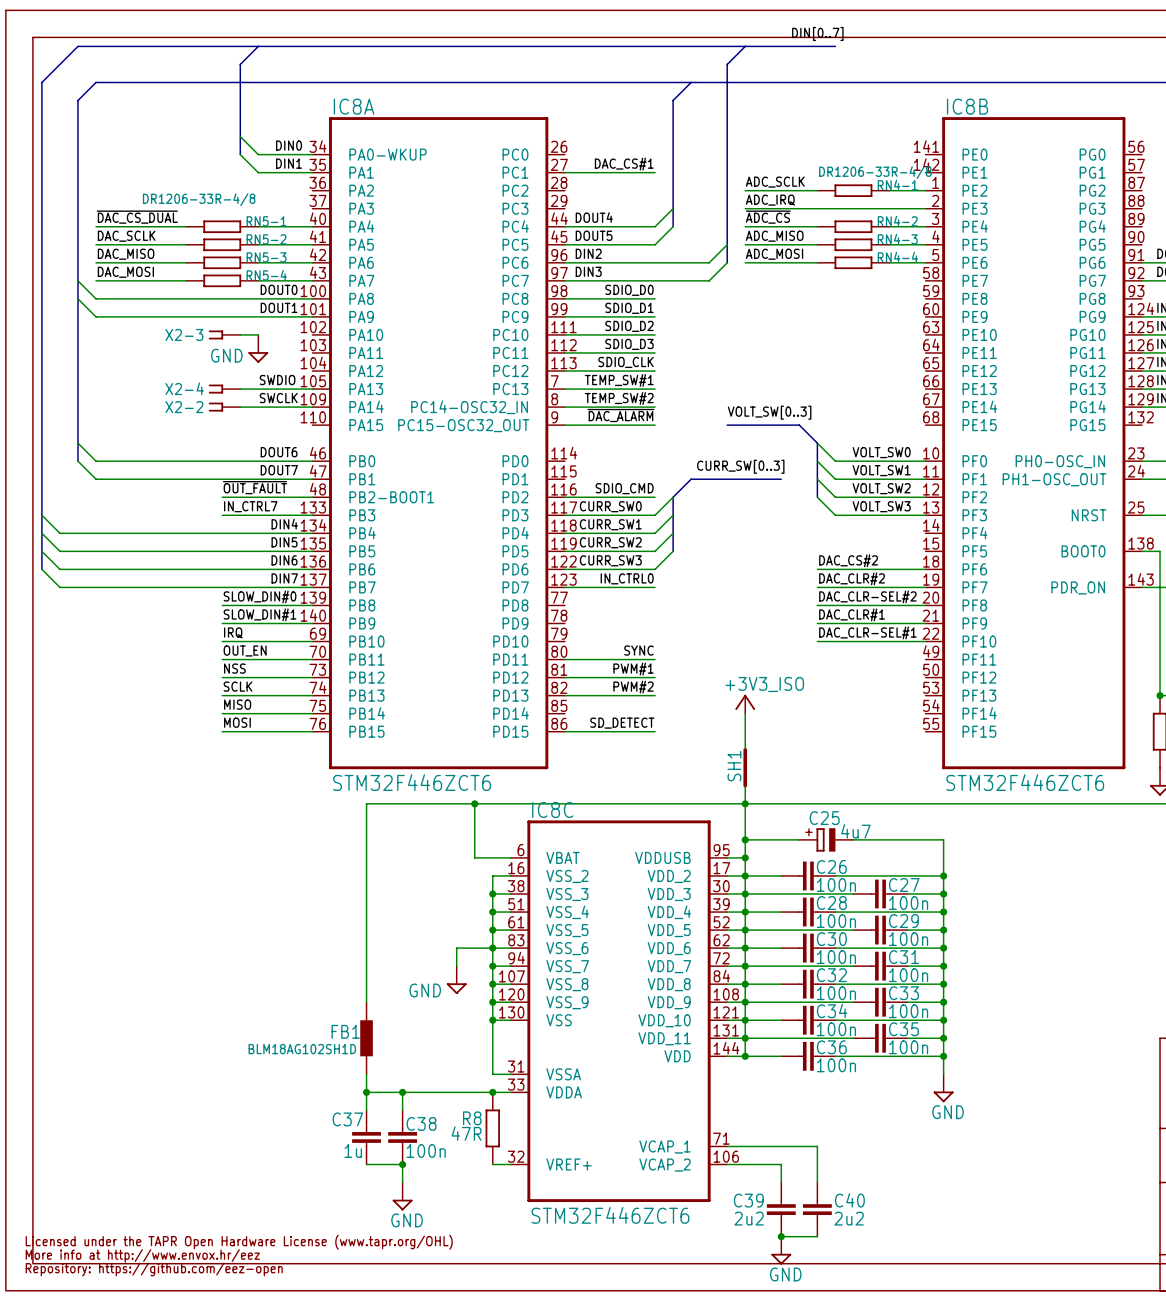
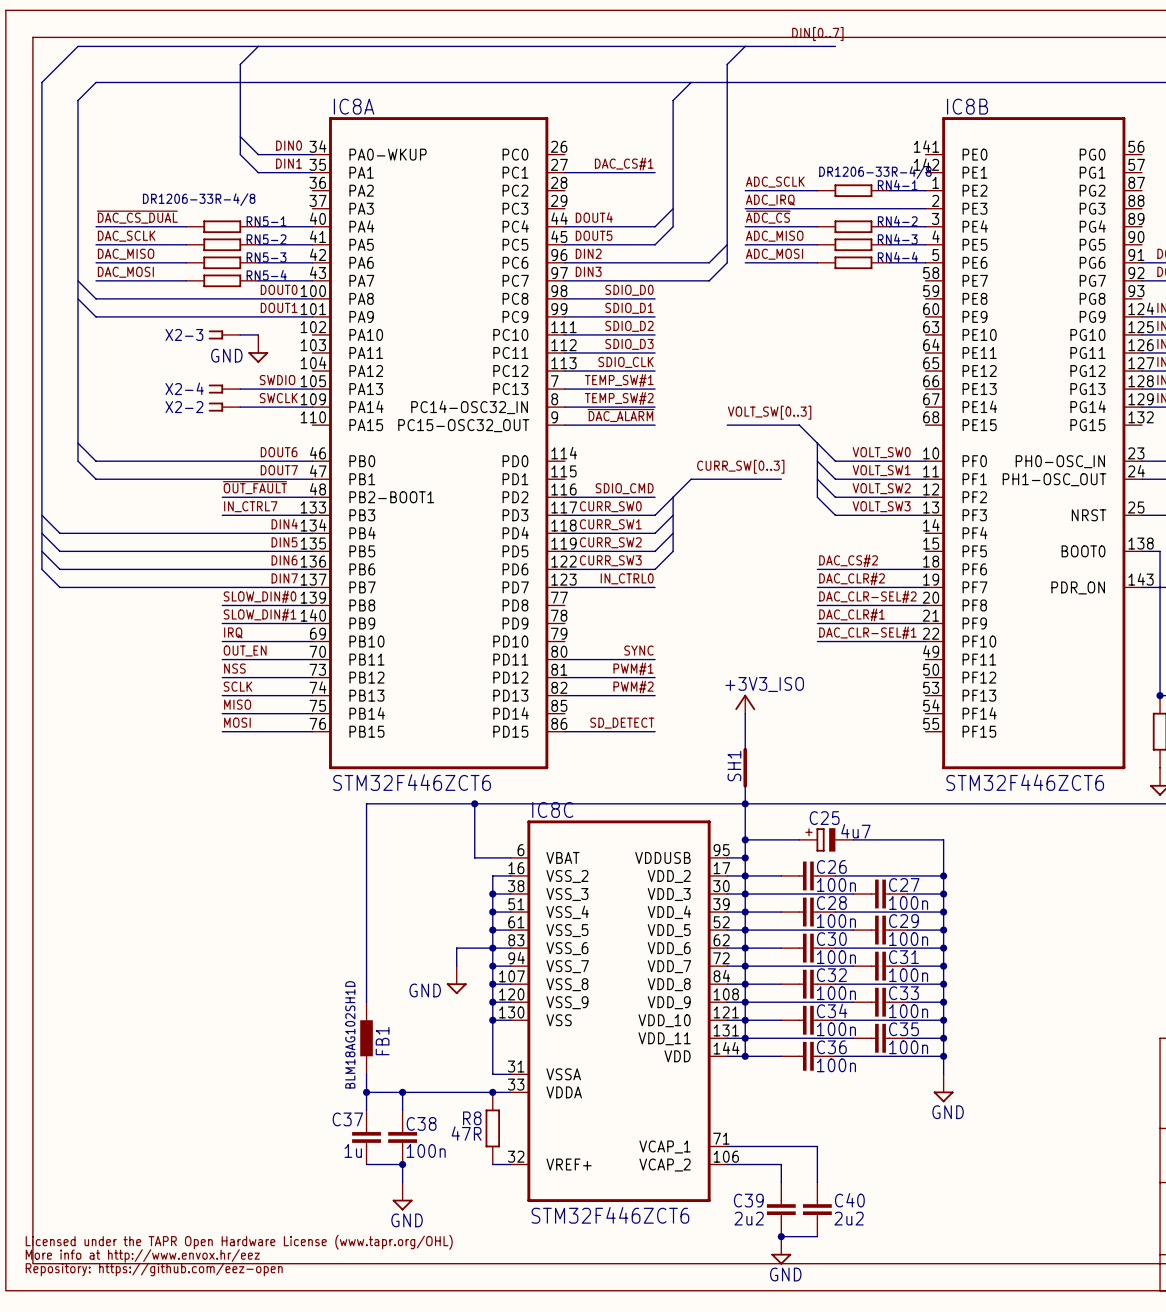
FB1 name rotation: 0° (345, 1031) -> 90° counterclockwise (382, 1041)
FB1 name position: FB1 (345, 1031) -> FB1 (382, 1041)
FB1 value rotation: 0° (302, 1049) -> 90° counterclockwise (350, 1034)

